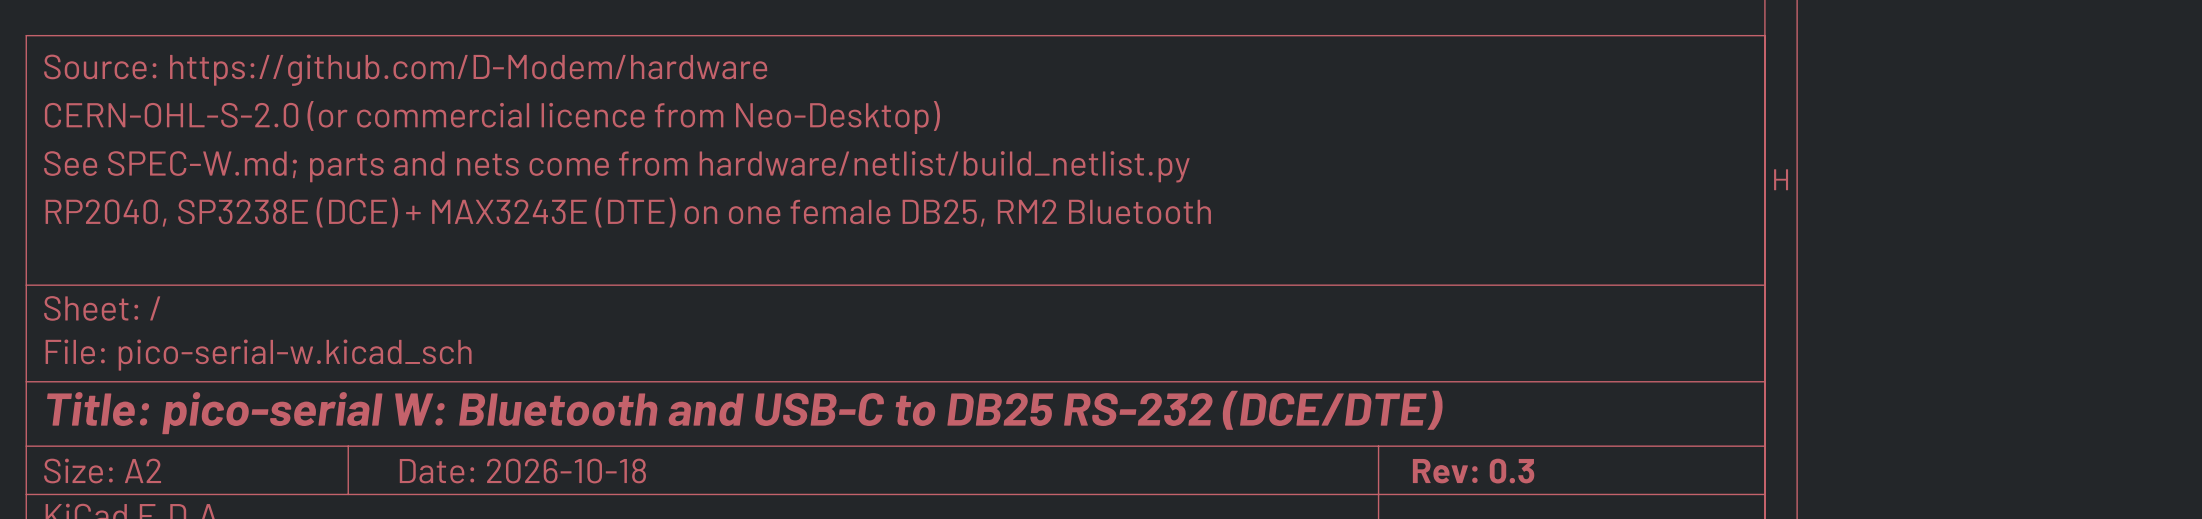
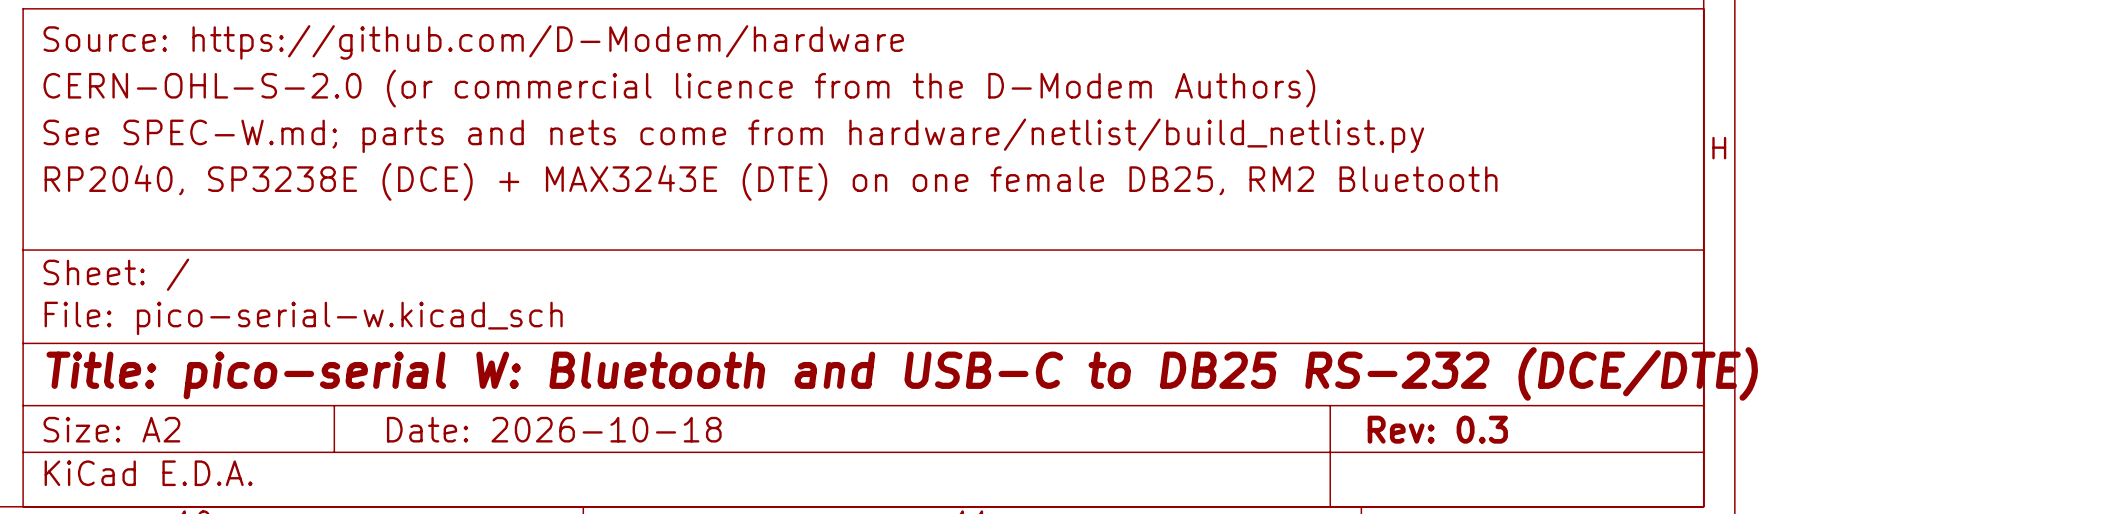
title block: CERN-OHL-S-2.0 (or commercial licence from Neo-Desktop) (492, 117) -> CERN-OHL-S-2.0 (or commercial licence from the D-Modem Authors) (679, 88)

